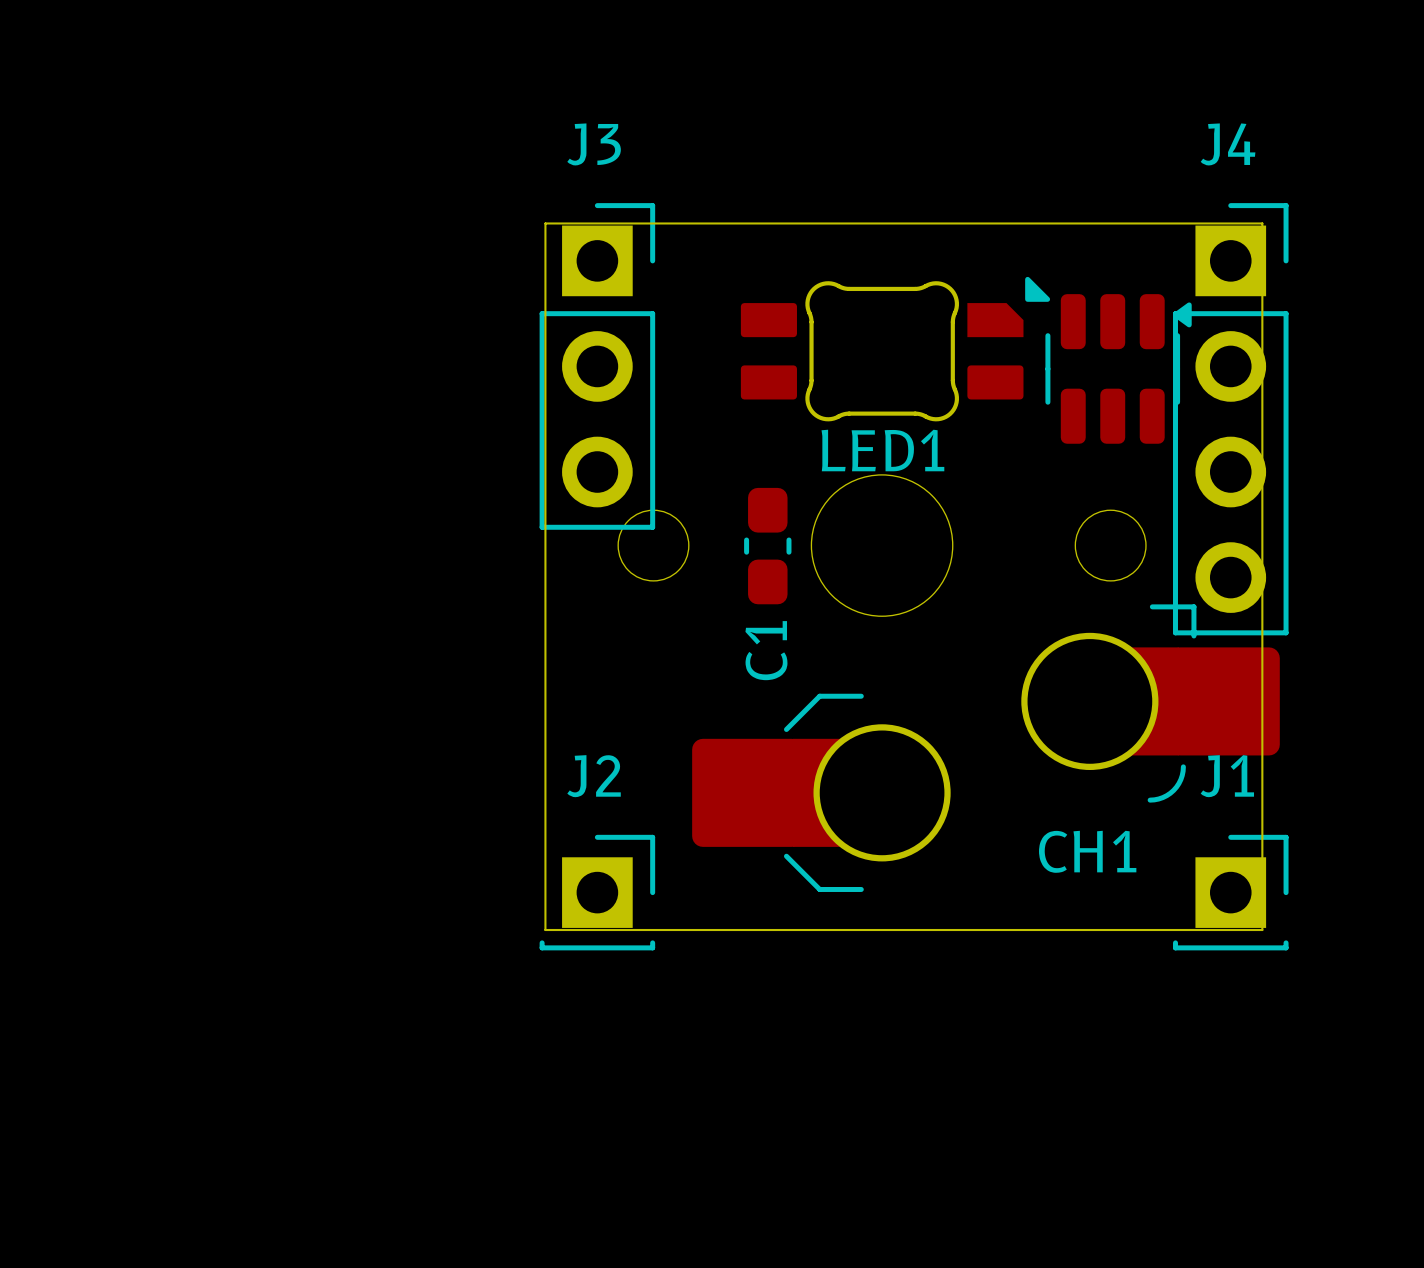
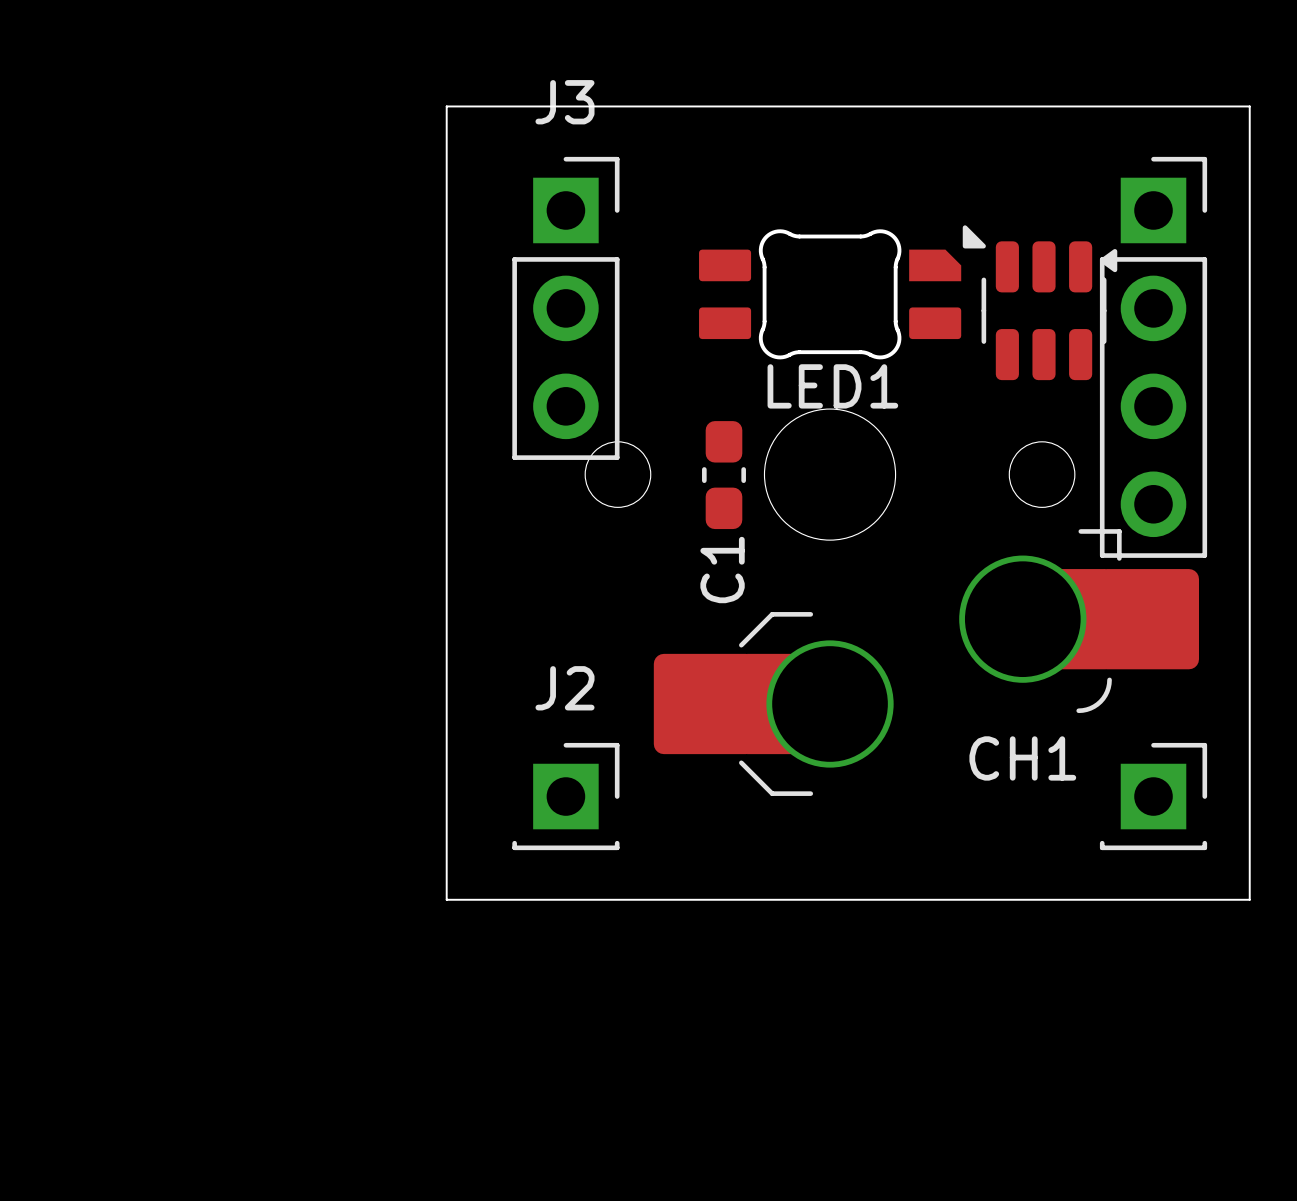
J4 name: J4 (1228, 144) -> none
board edge: (545, 223) (1262, 223) (1262, 930) (545, 930) (545, 223) -> (446, 106) (446, 899) (1249, 899) (1249, 106) (446, 106)
J1 name: J1 (1227, 776) -> none

